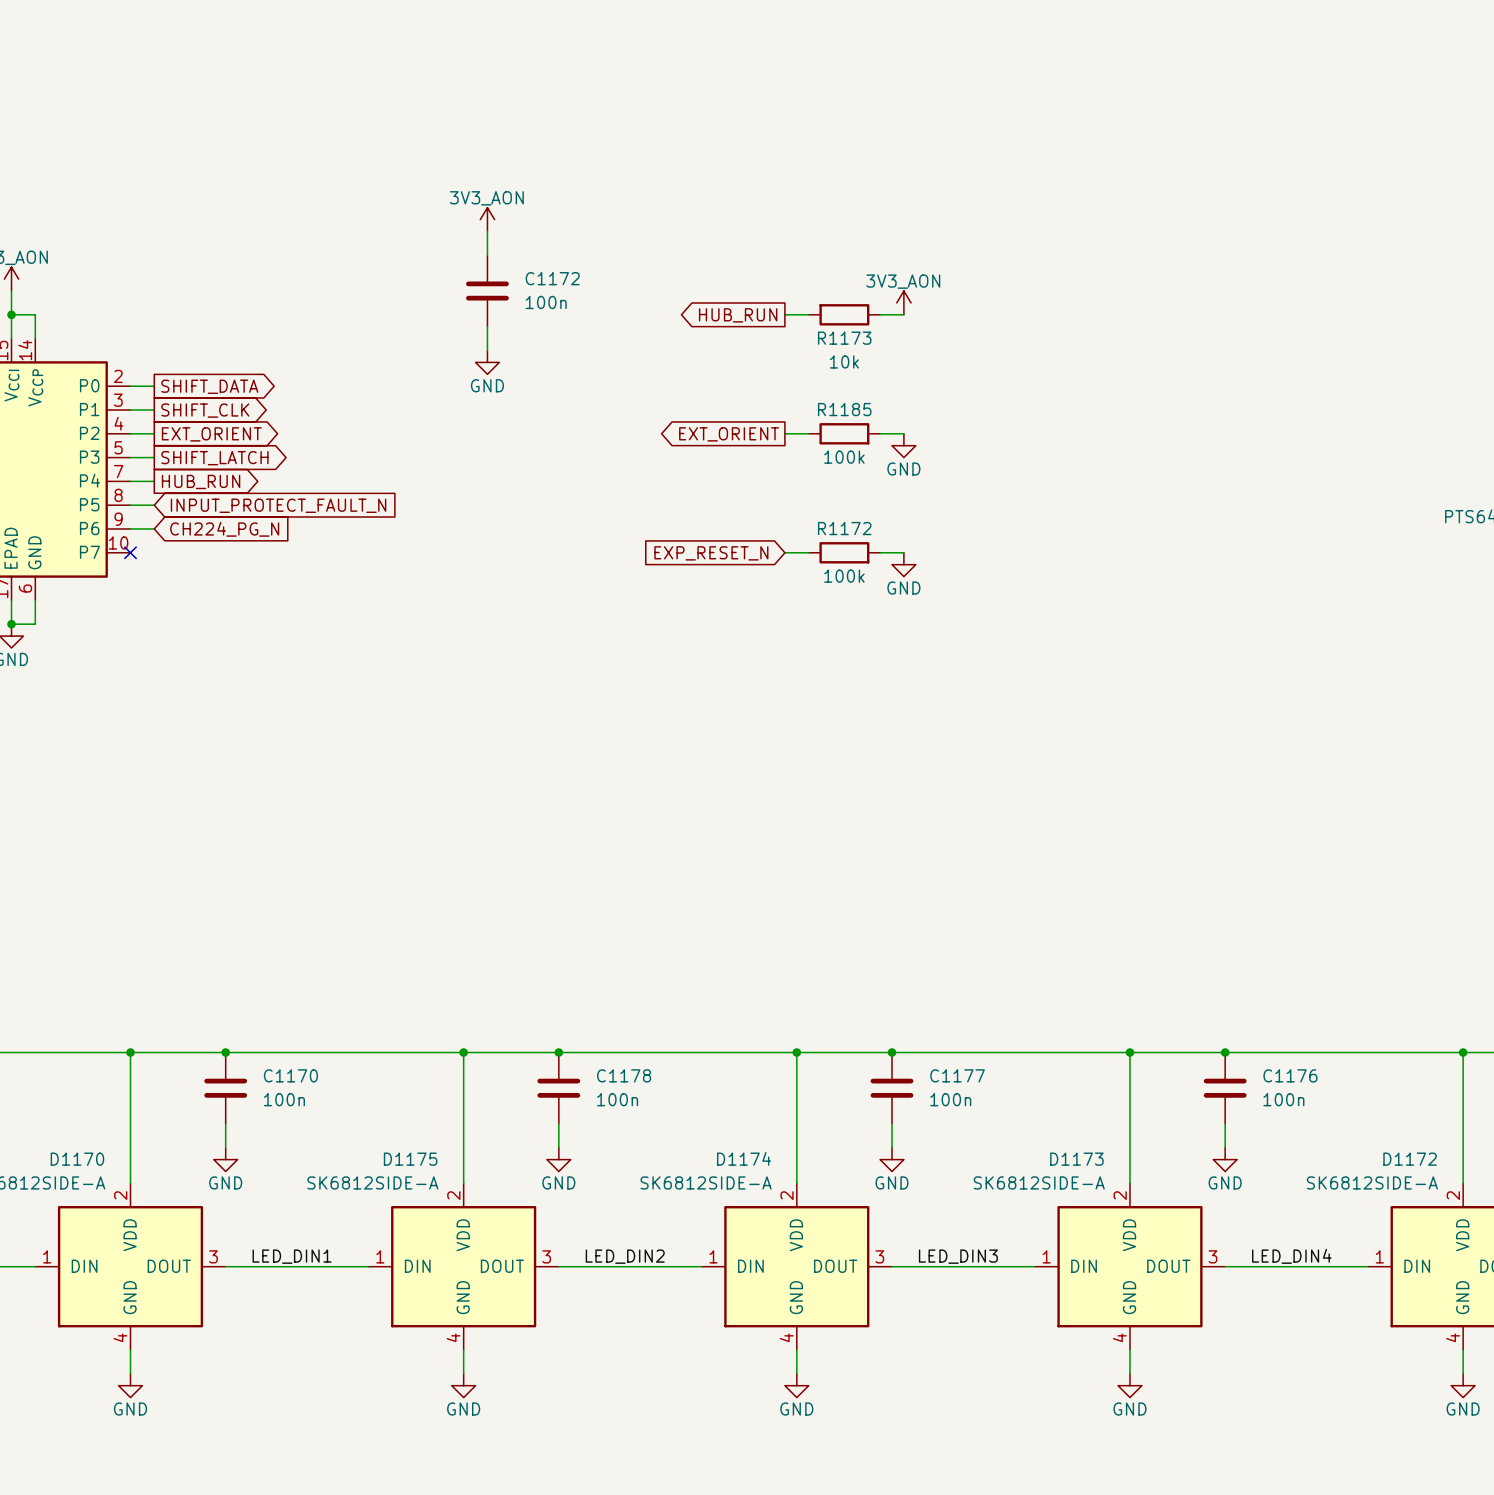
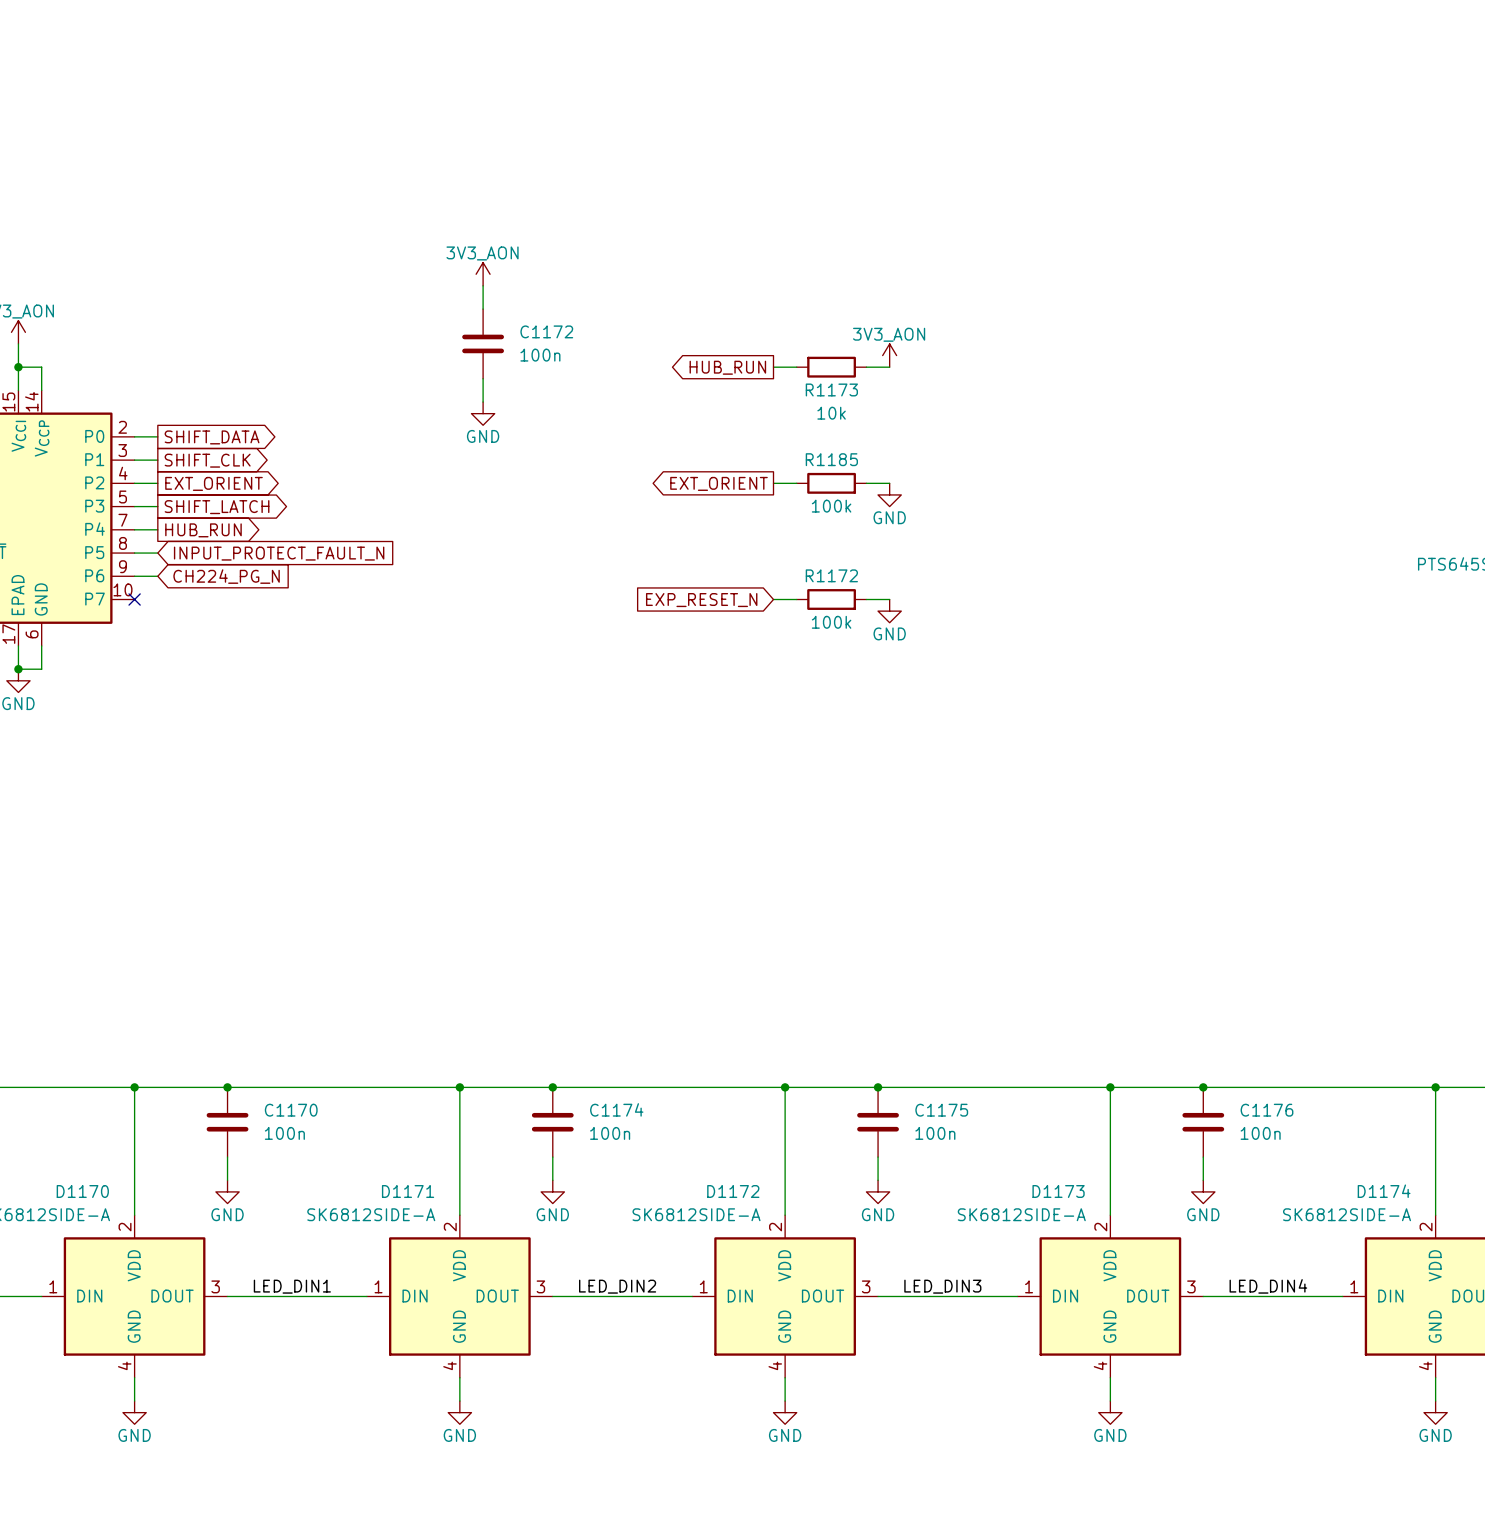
C1178 name: C1178 (624, 1075) -> C1174 (616, 1109)
C1177 name: C1177 (957, 1075) -> C1175 (941, 1110)
D1174 name: D1174 (744, 1158) -> D1172 (733, 1191)
D1175 name: D1175 (410, 1159) -> D1171 (408, 1191)
D1172 name: D1172 (1410, 1159) -> D1174 (1384, 1191)

